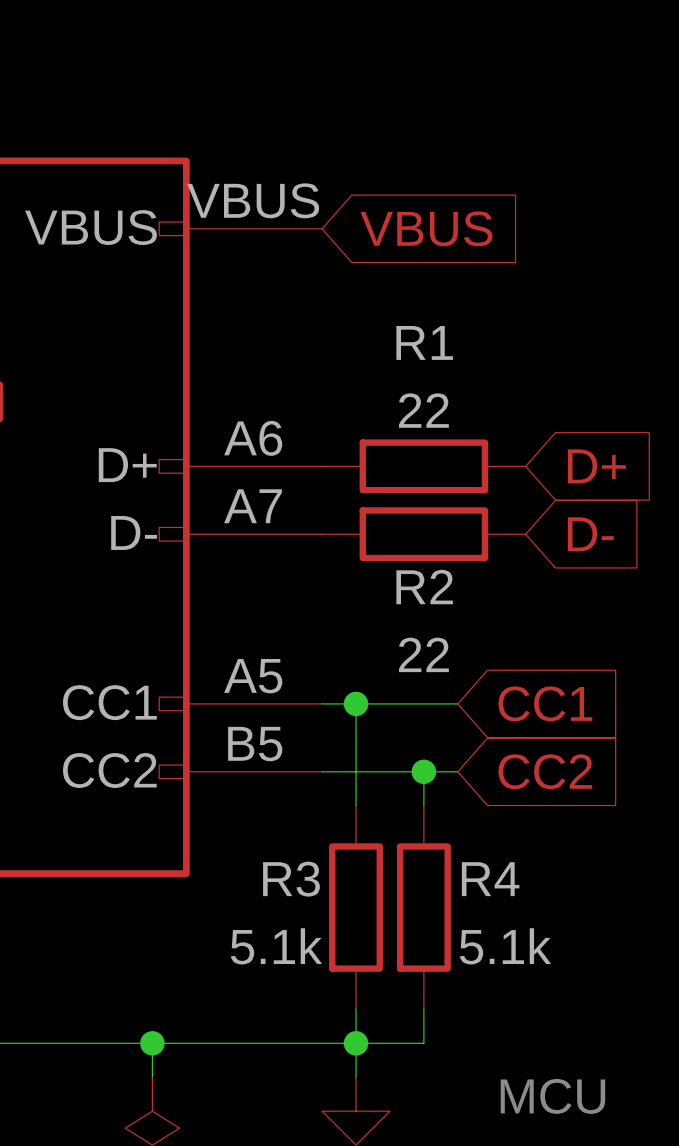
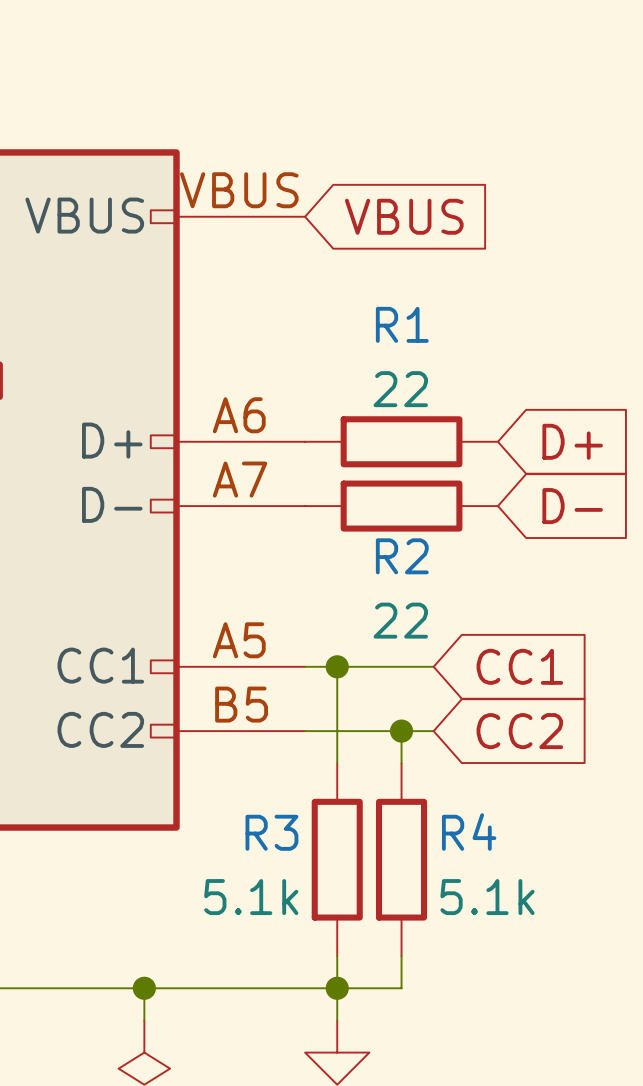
text: MCU (552, 1096) -> none

